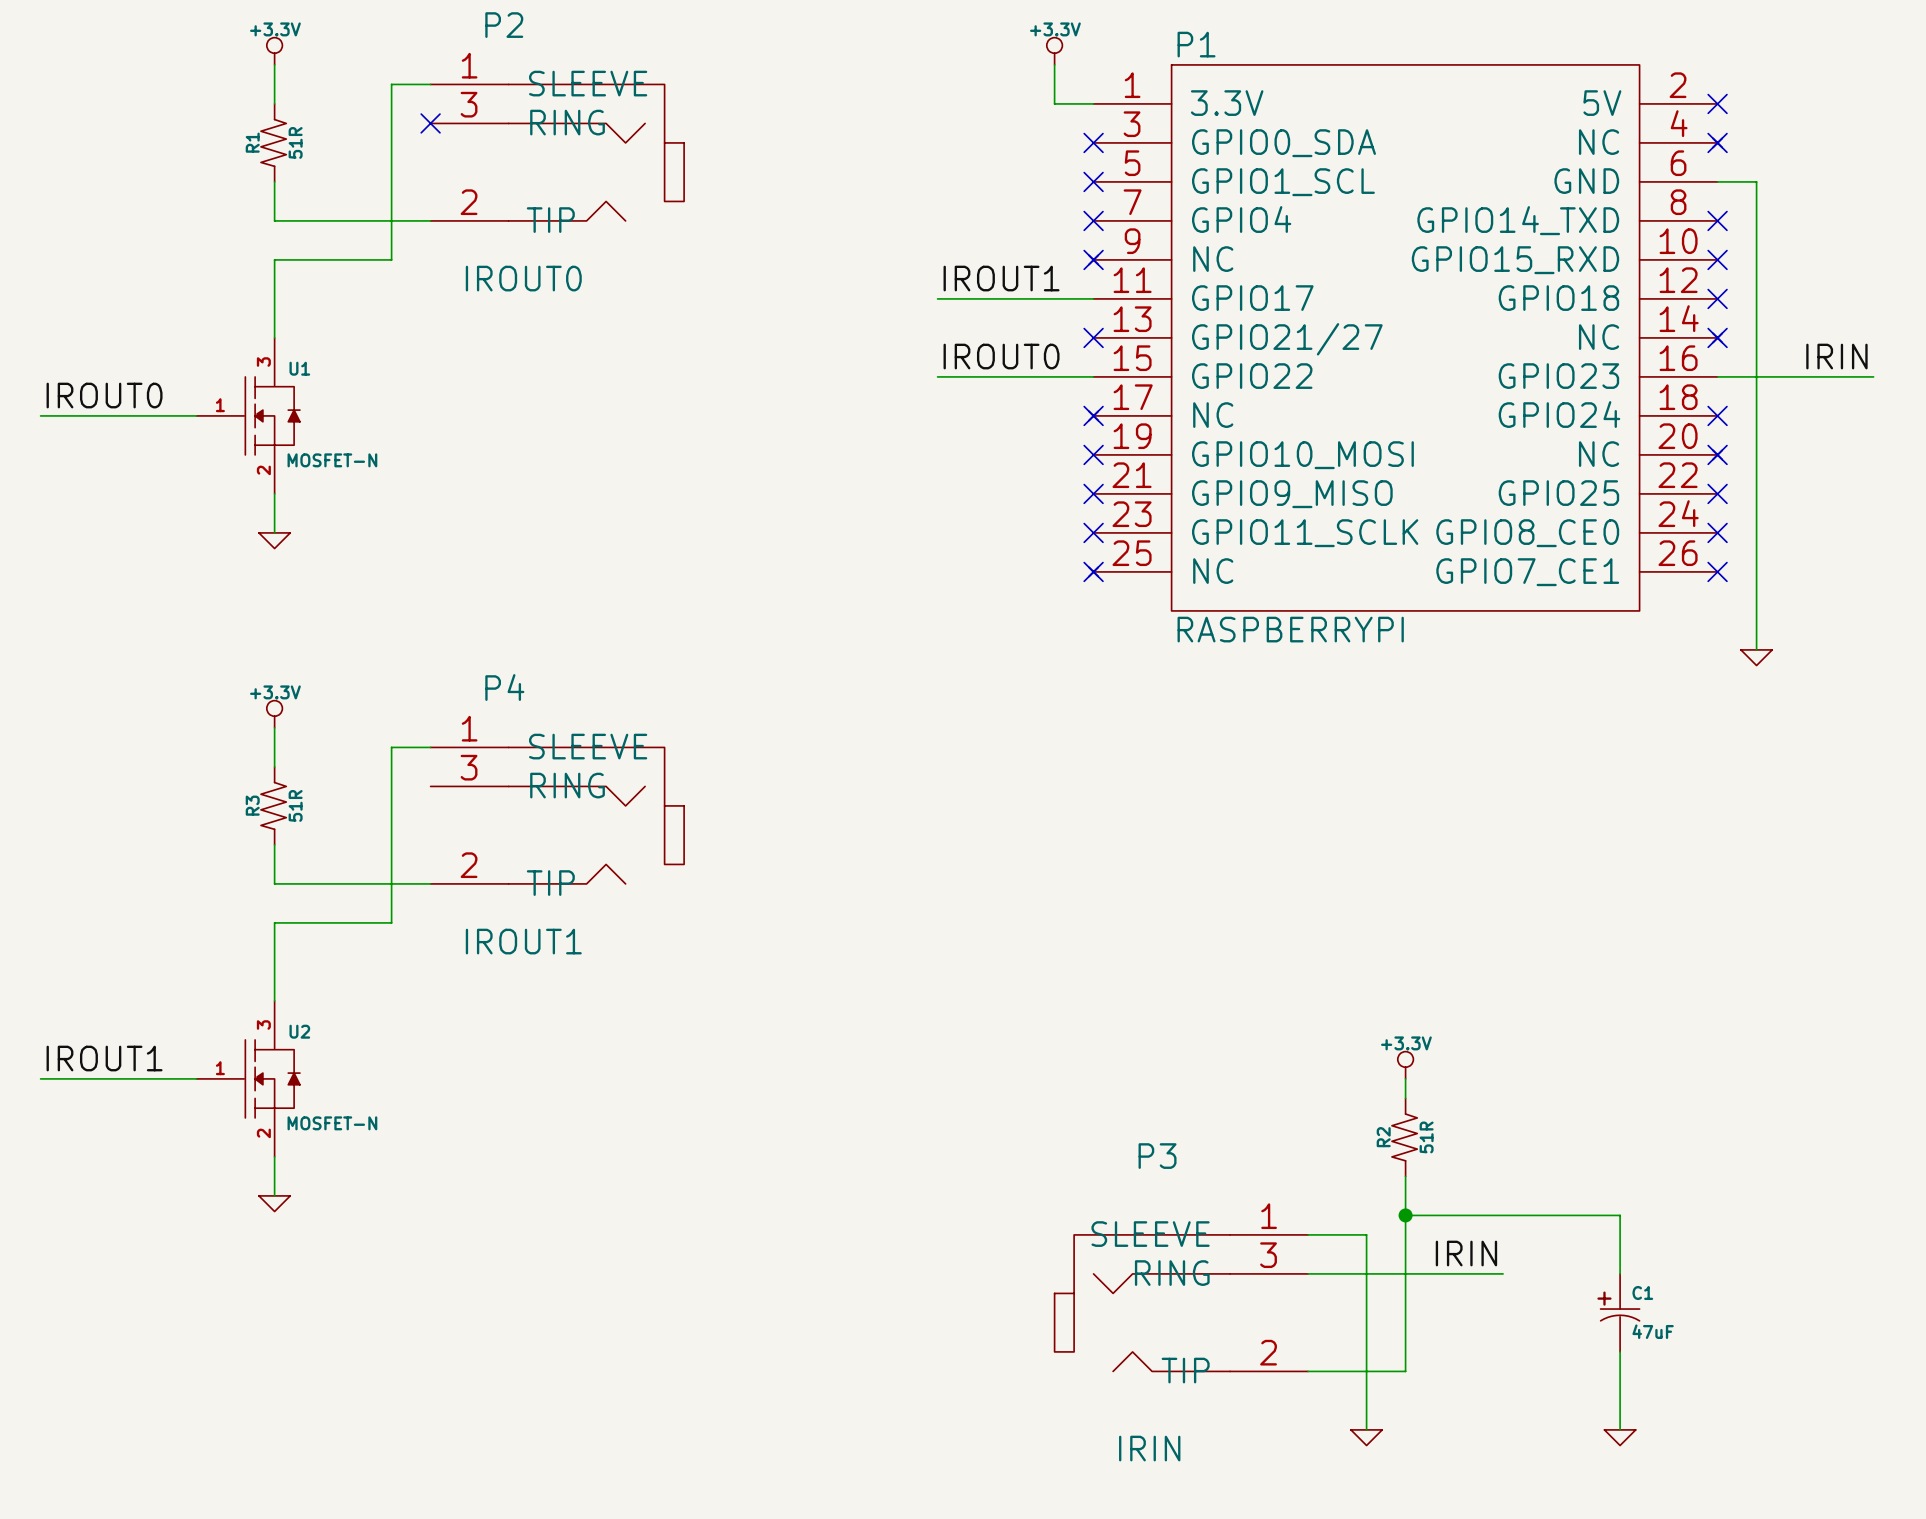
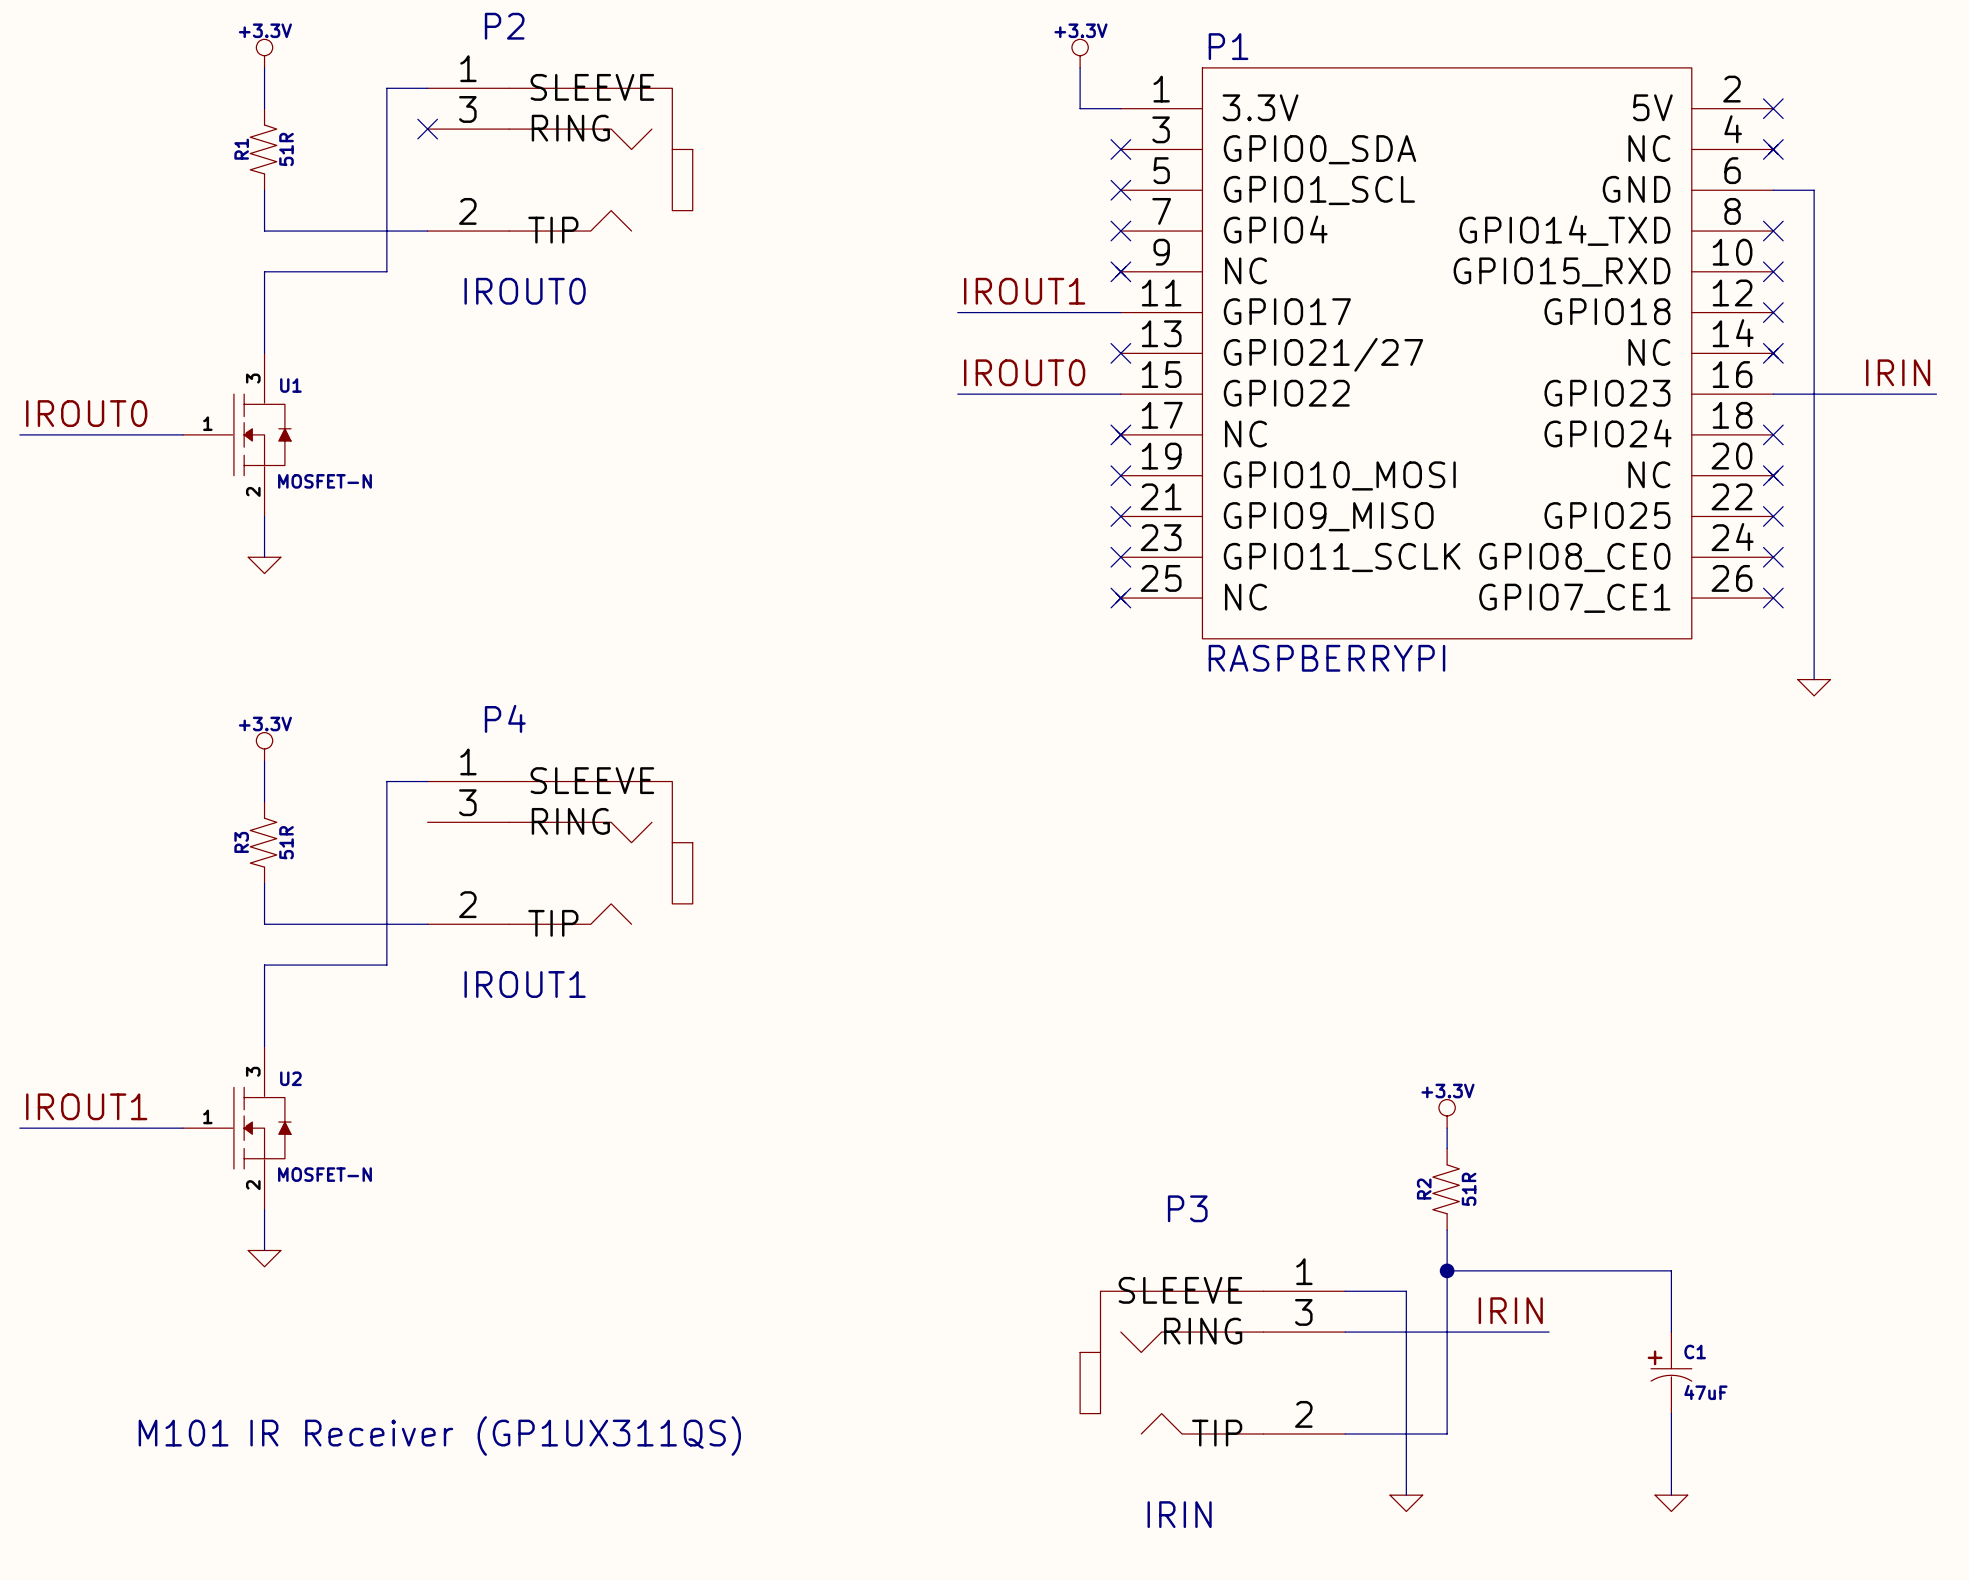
M101: none -> IR Receiver (GP1UX311QS) (439, 1435)

